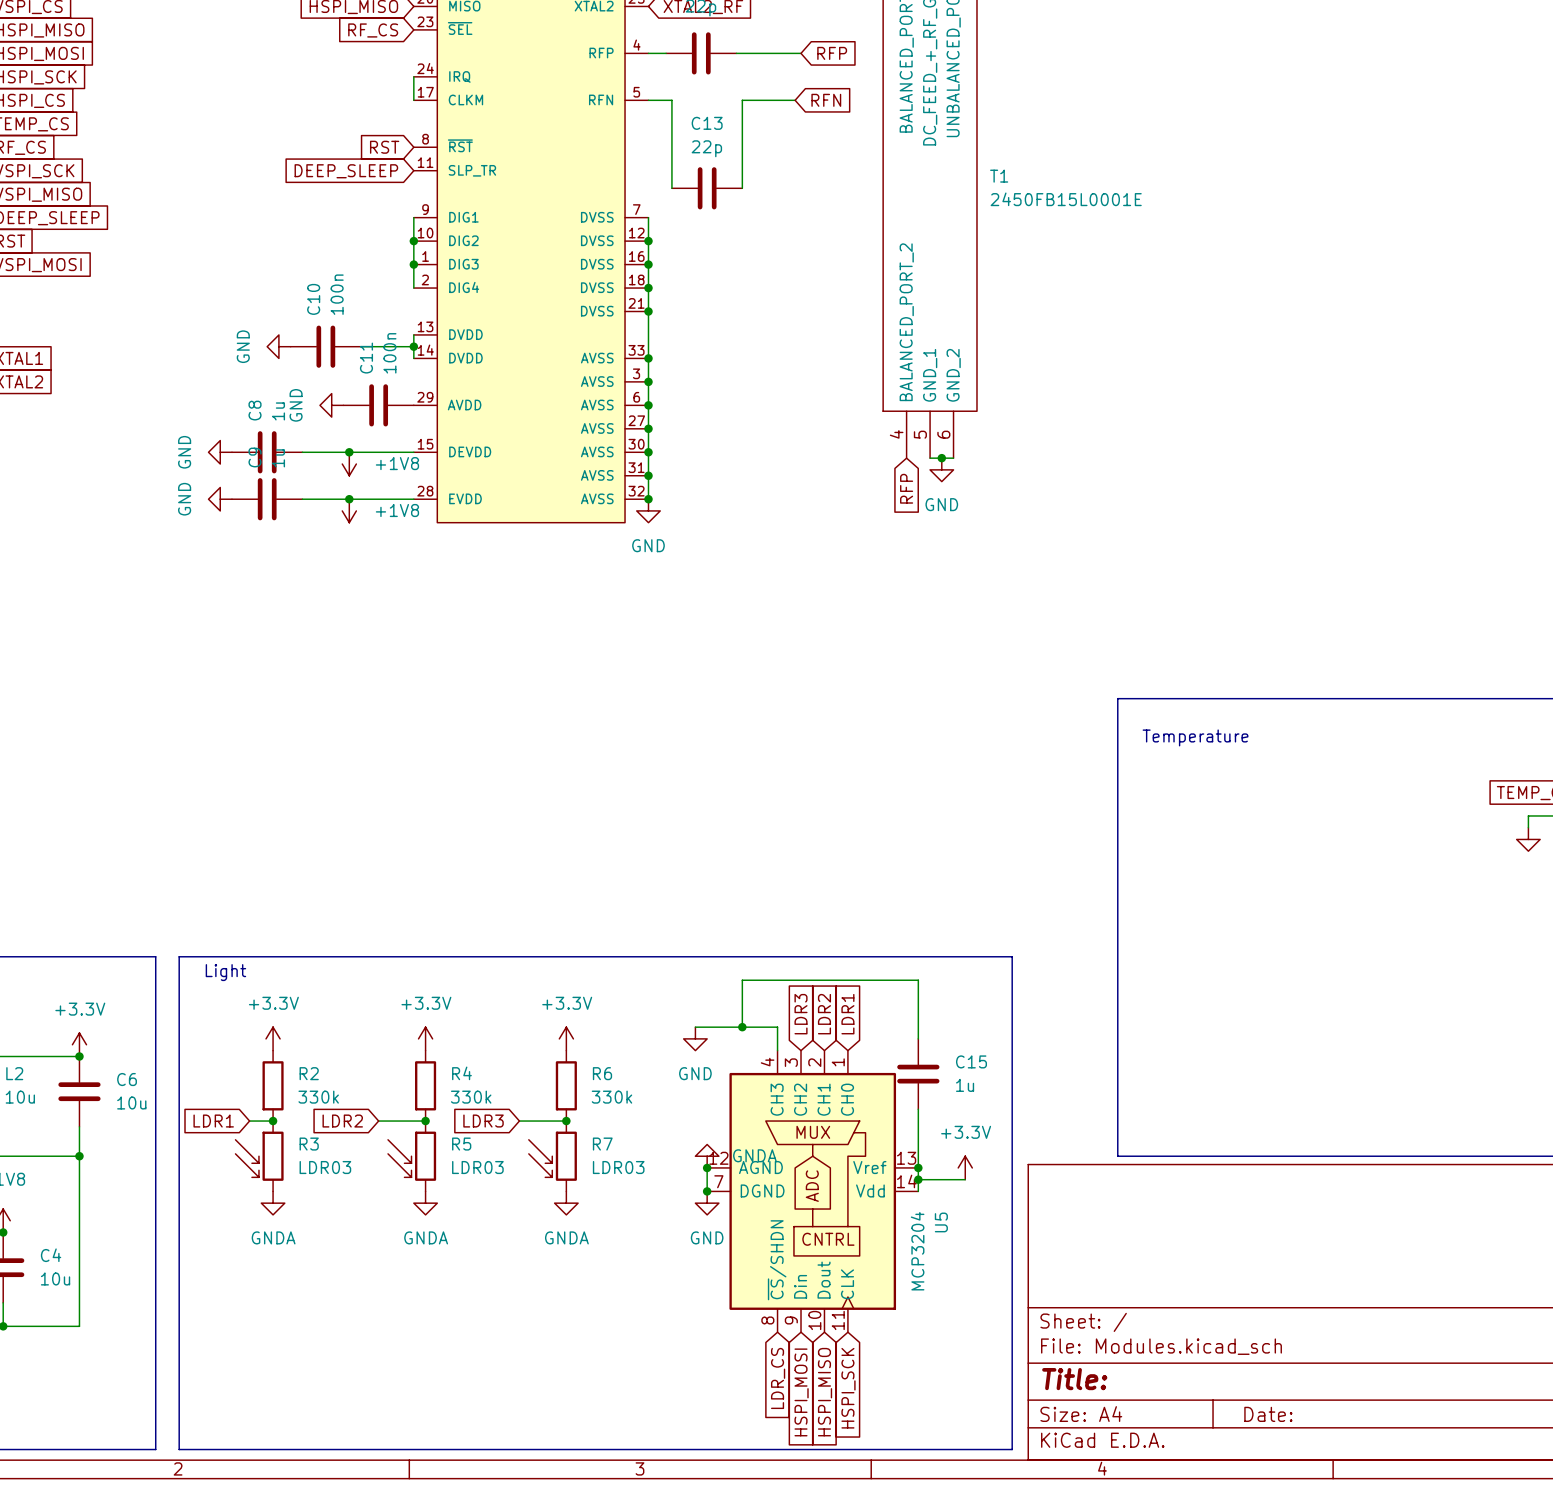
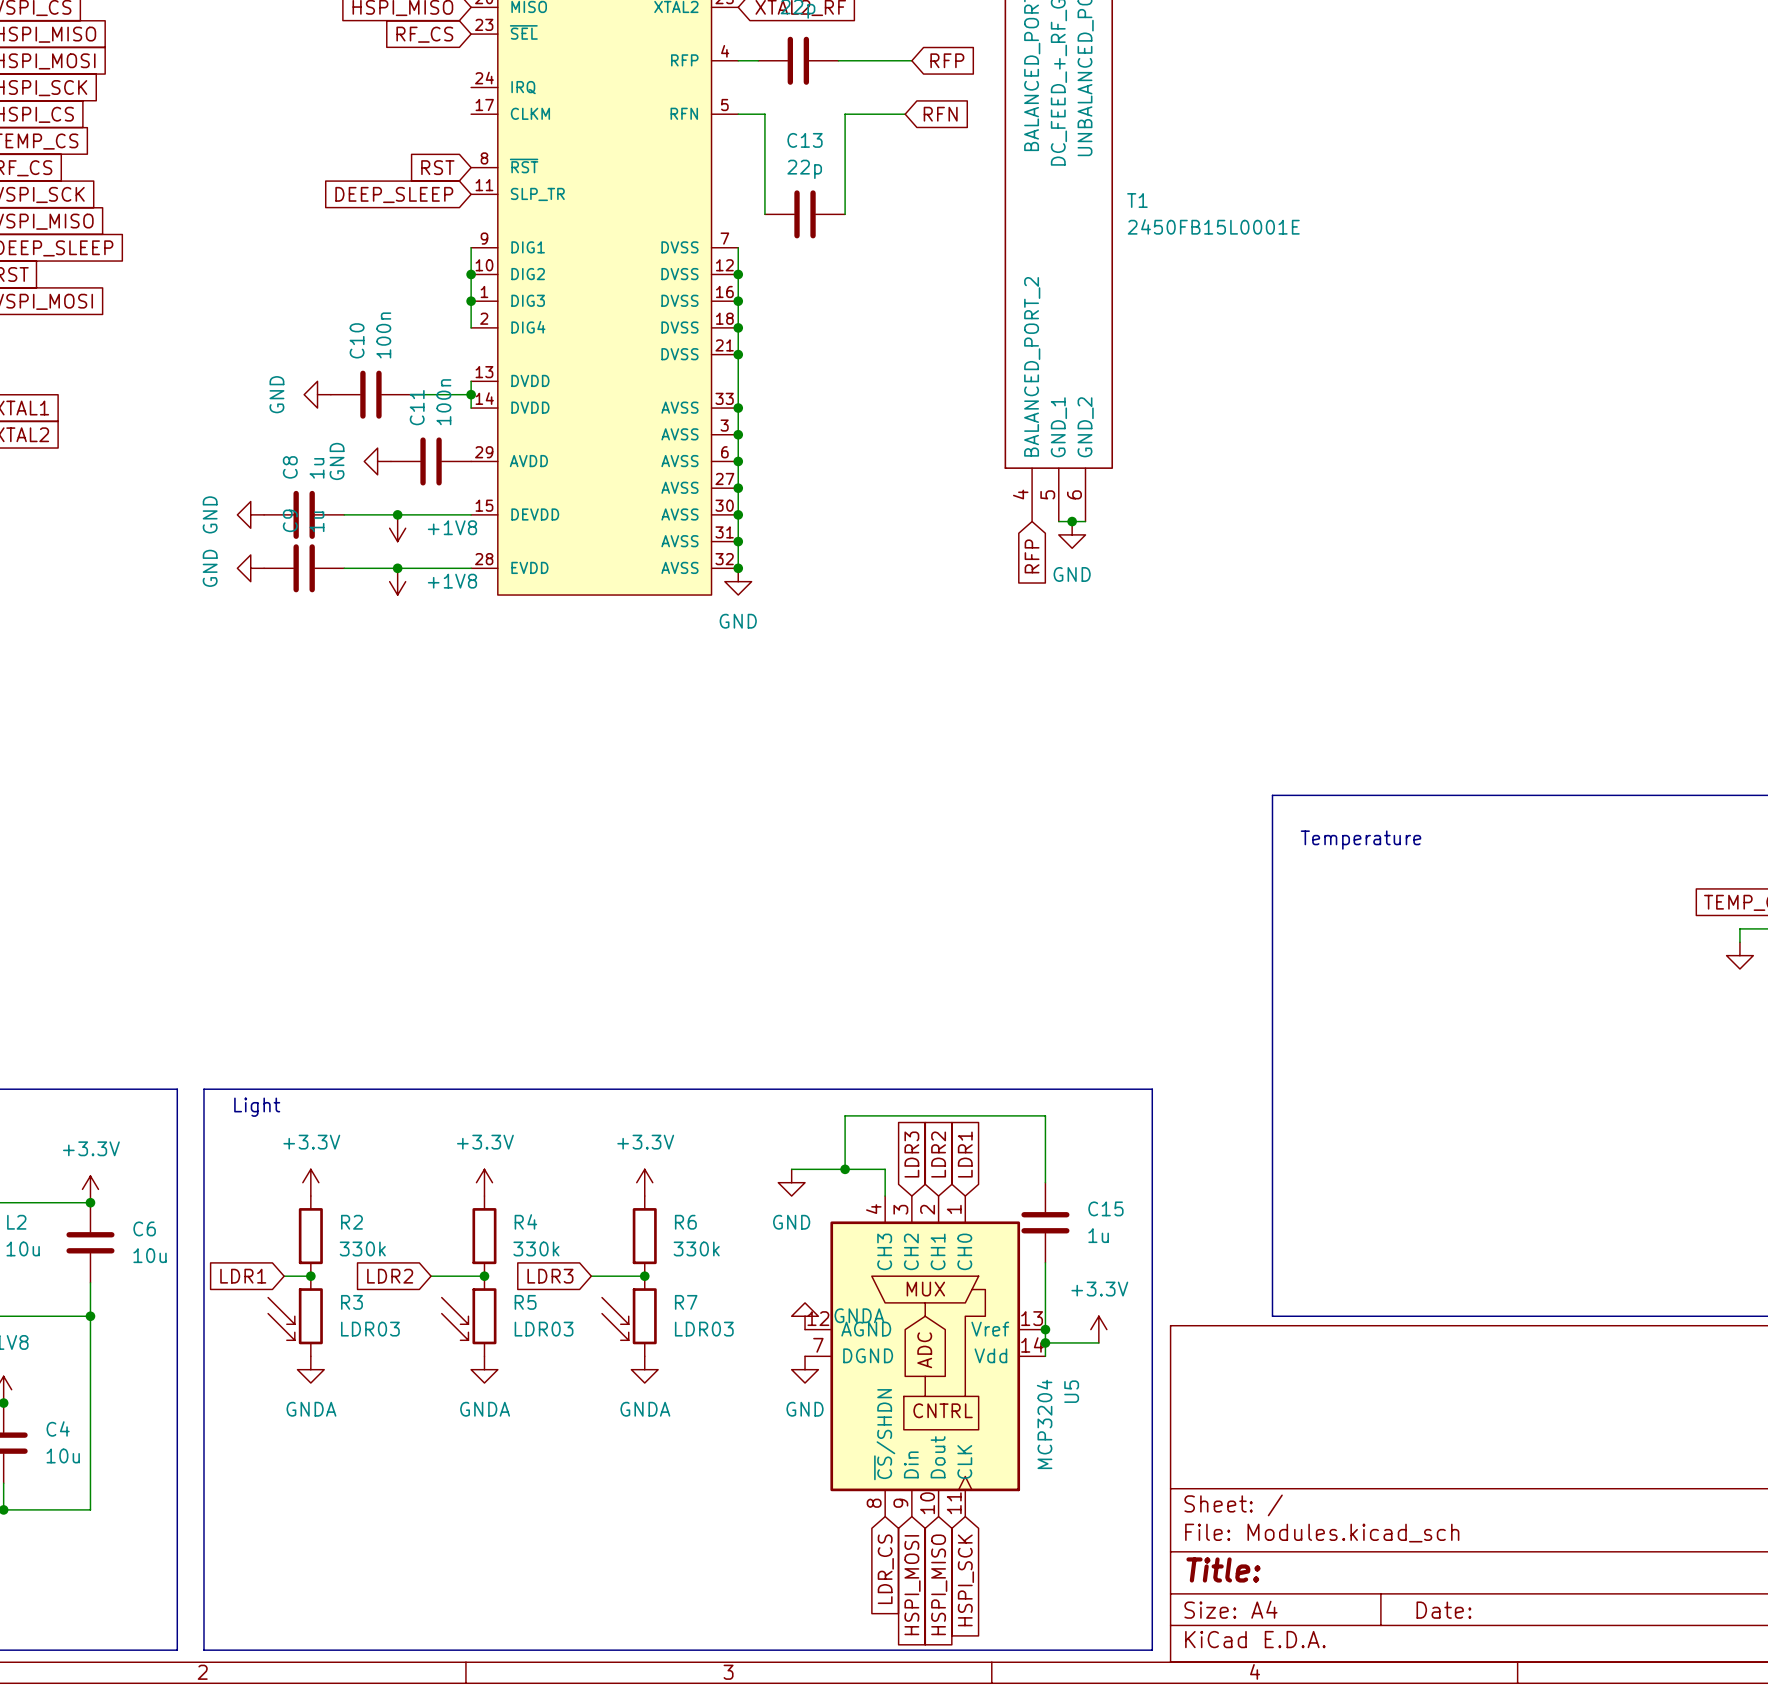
wire: (413, 76) (413, 100) -> none
wire: (707, 1167) (707, 1191) -> none
junction: (707, 1167) -> none
junction: (707, 1191) -> none

